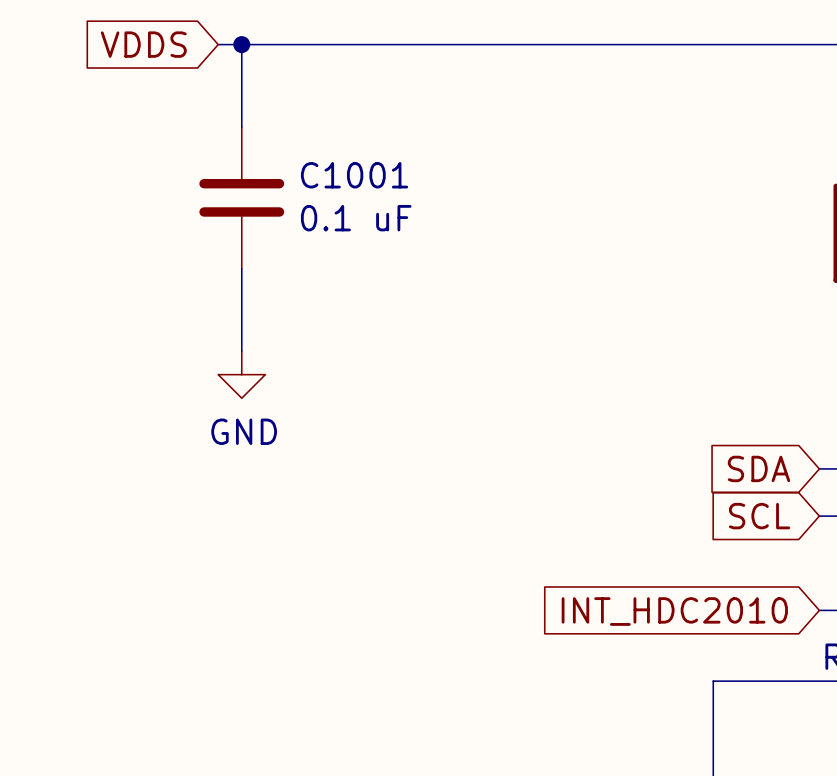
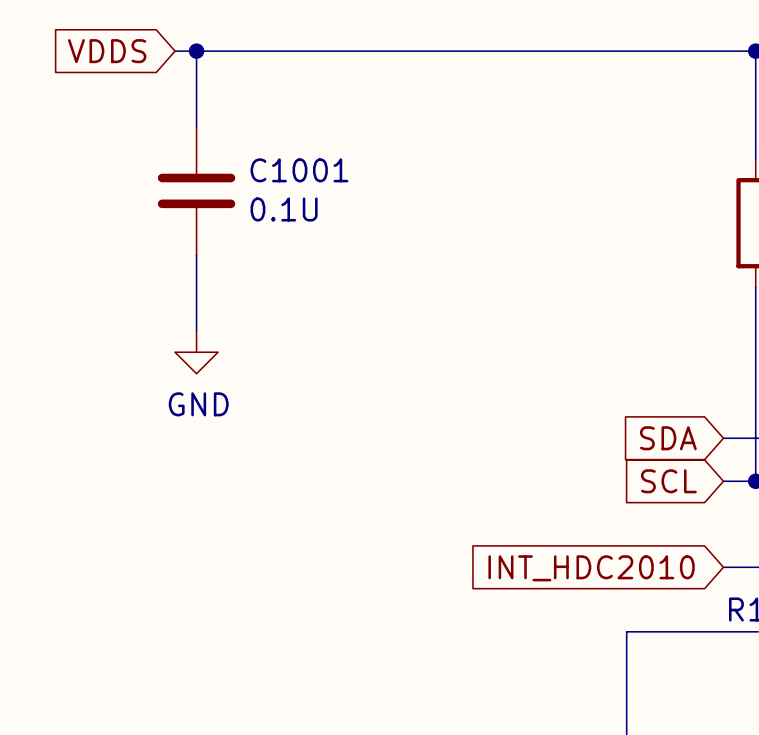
C1001 value: 0.1 uF (356, 218) -> 0.1U (284, 209)

